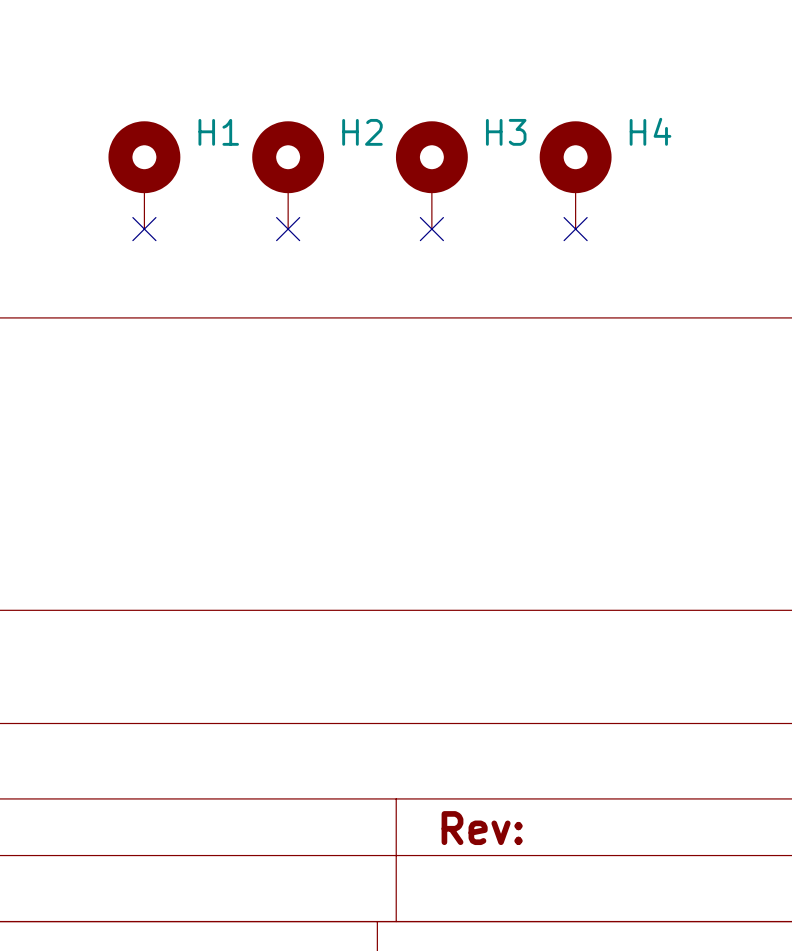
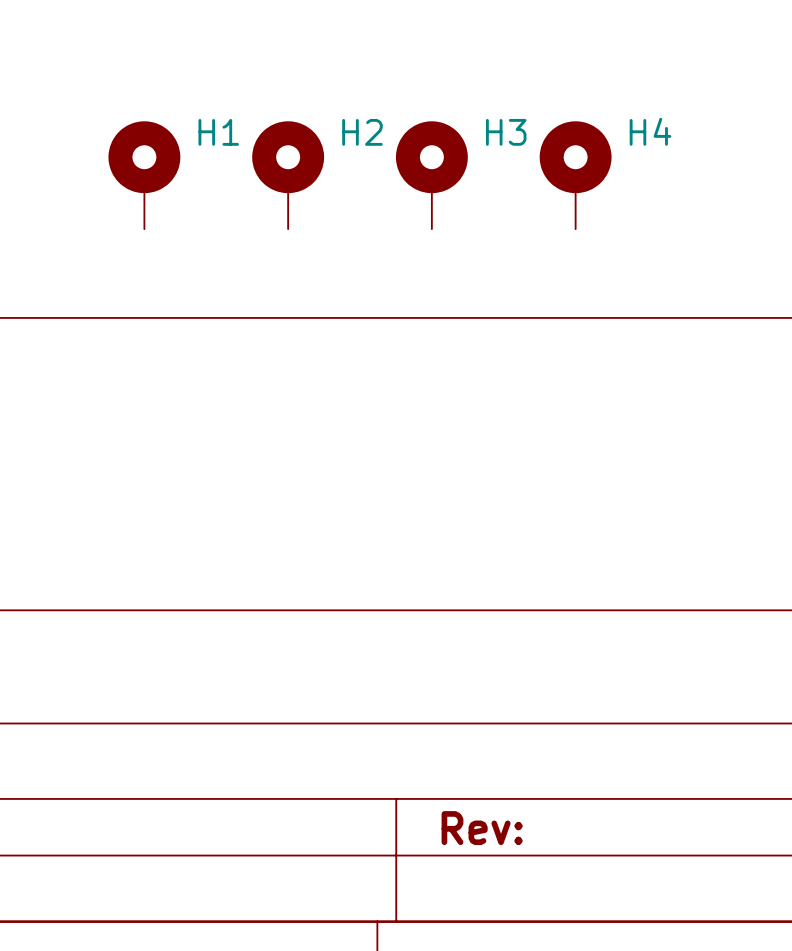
no-connect mark: (144, 229) -> none
no-connect mark: (288, 229) -> none
no-connect mark: (431, 229) -> none
no-connect mark: (575, 229) -> none

